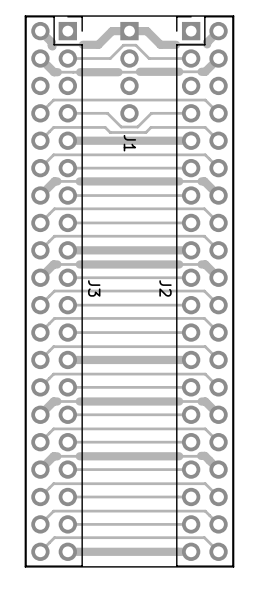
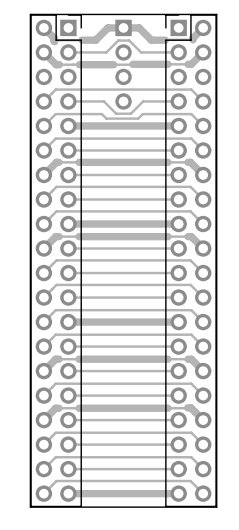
J1 name: J1 (129, 143) -> none
J3 name: J3 (94, 288) -> none
J2 name: J2 (165, 288) -> none

